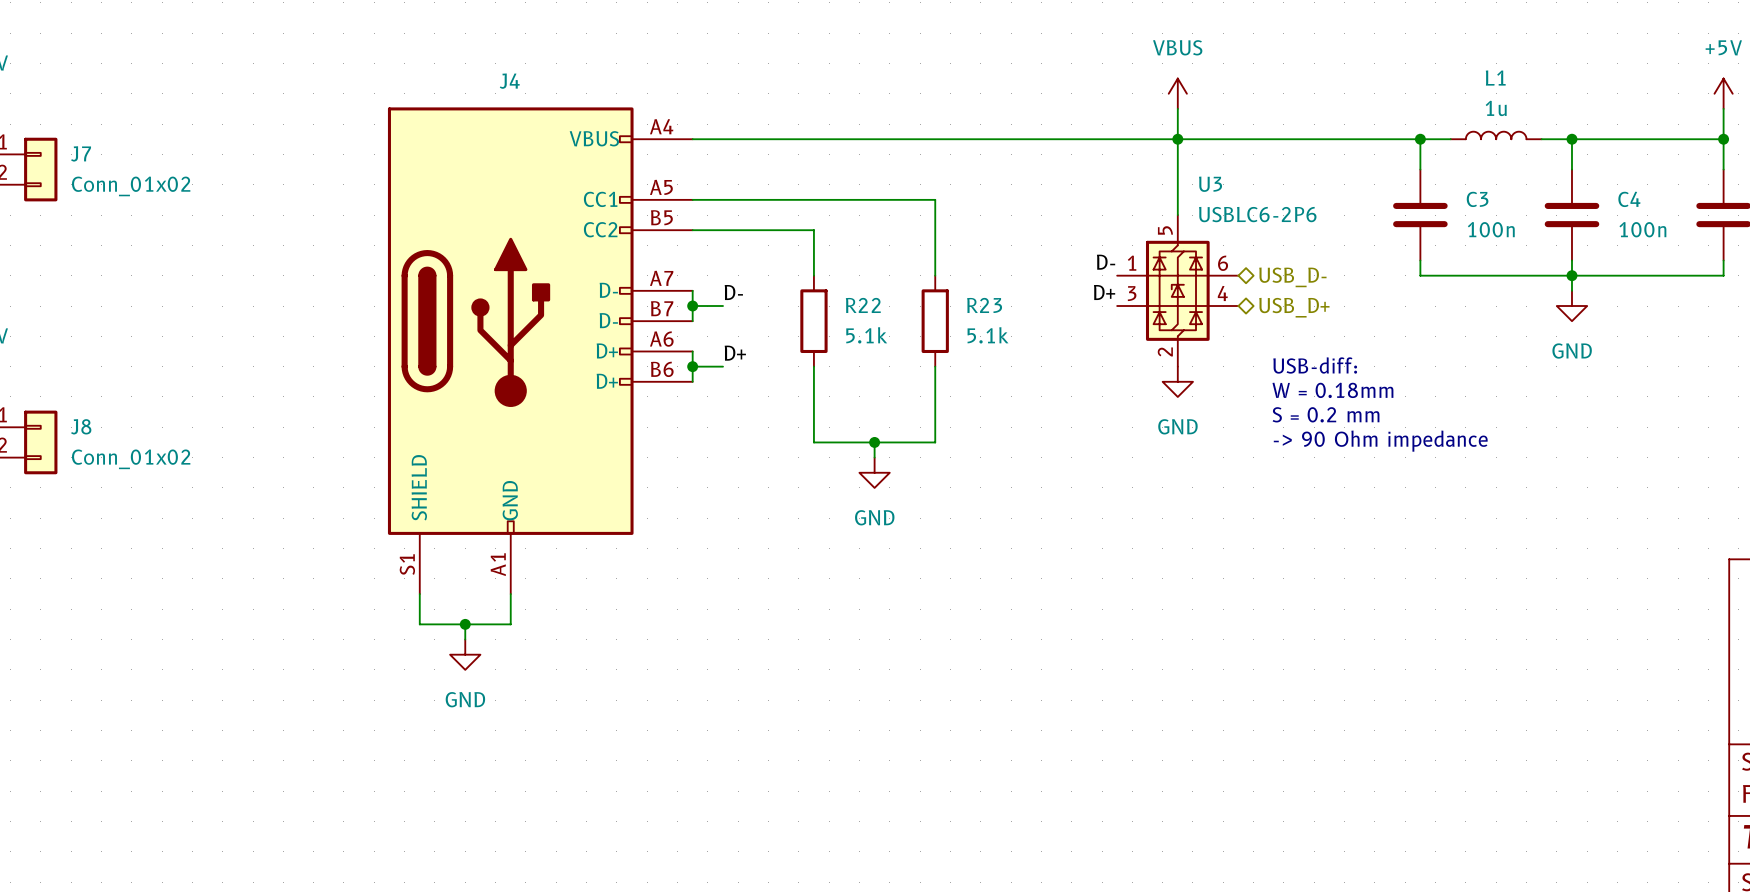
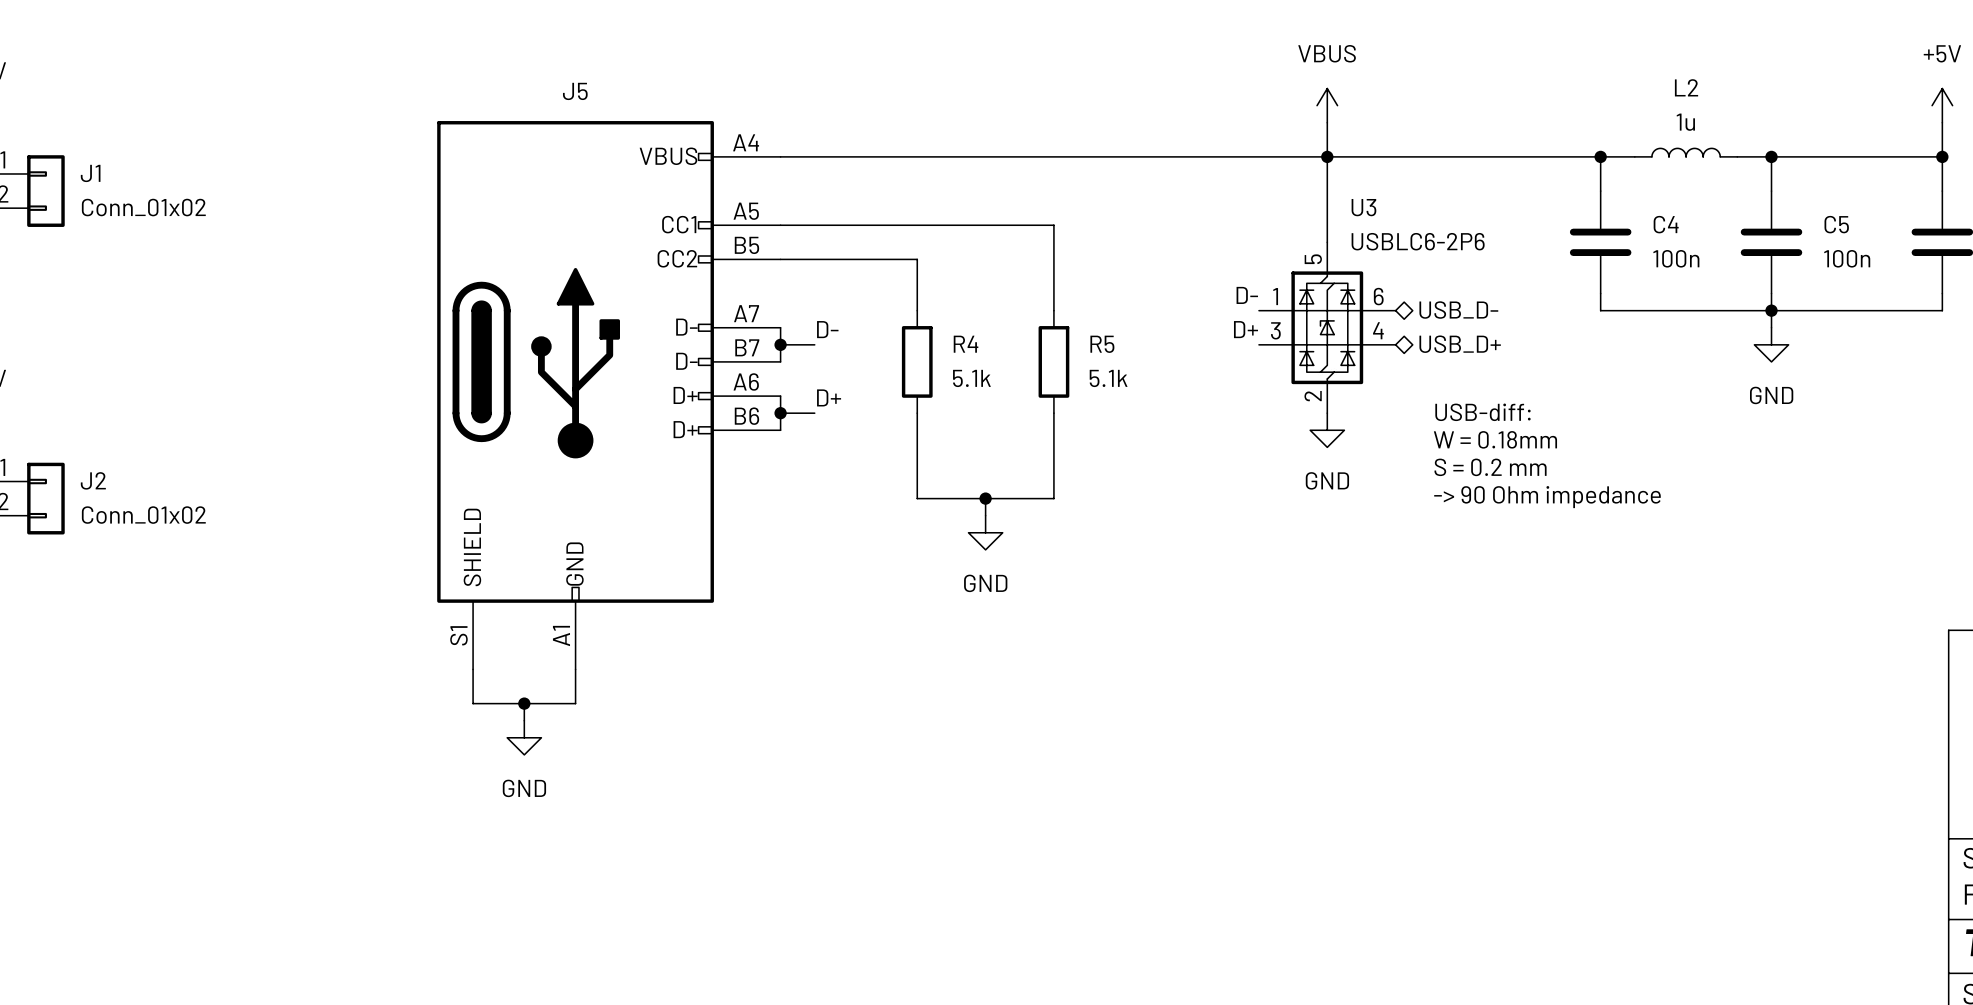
L1 name: L1 (1495, 78) -> L2 (1686, 87)
J4 name: J4 (509, 81) -> J5 (575, 91)
J7 name: J7 (81, 153) -> J1 (90, 173)
C3 name: C3 (1477, 199) -> C4 (1666, 224)
C4 name: C4 (1629, 199) -> C5 (1836, 224)
R22 name: R22 (863, 305) -> R4 (966, 344)
R23 name: R23 (984, 305) -> R5 (1102, 344)
J8 name: J8 (81, 426) -> J2 (93, 480)

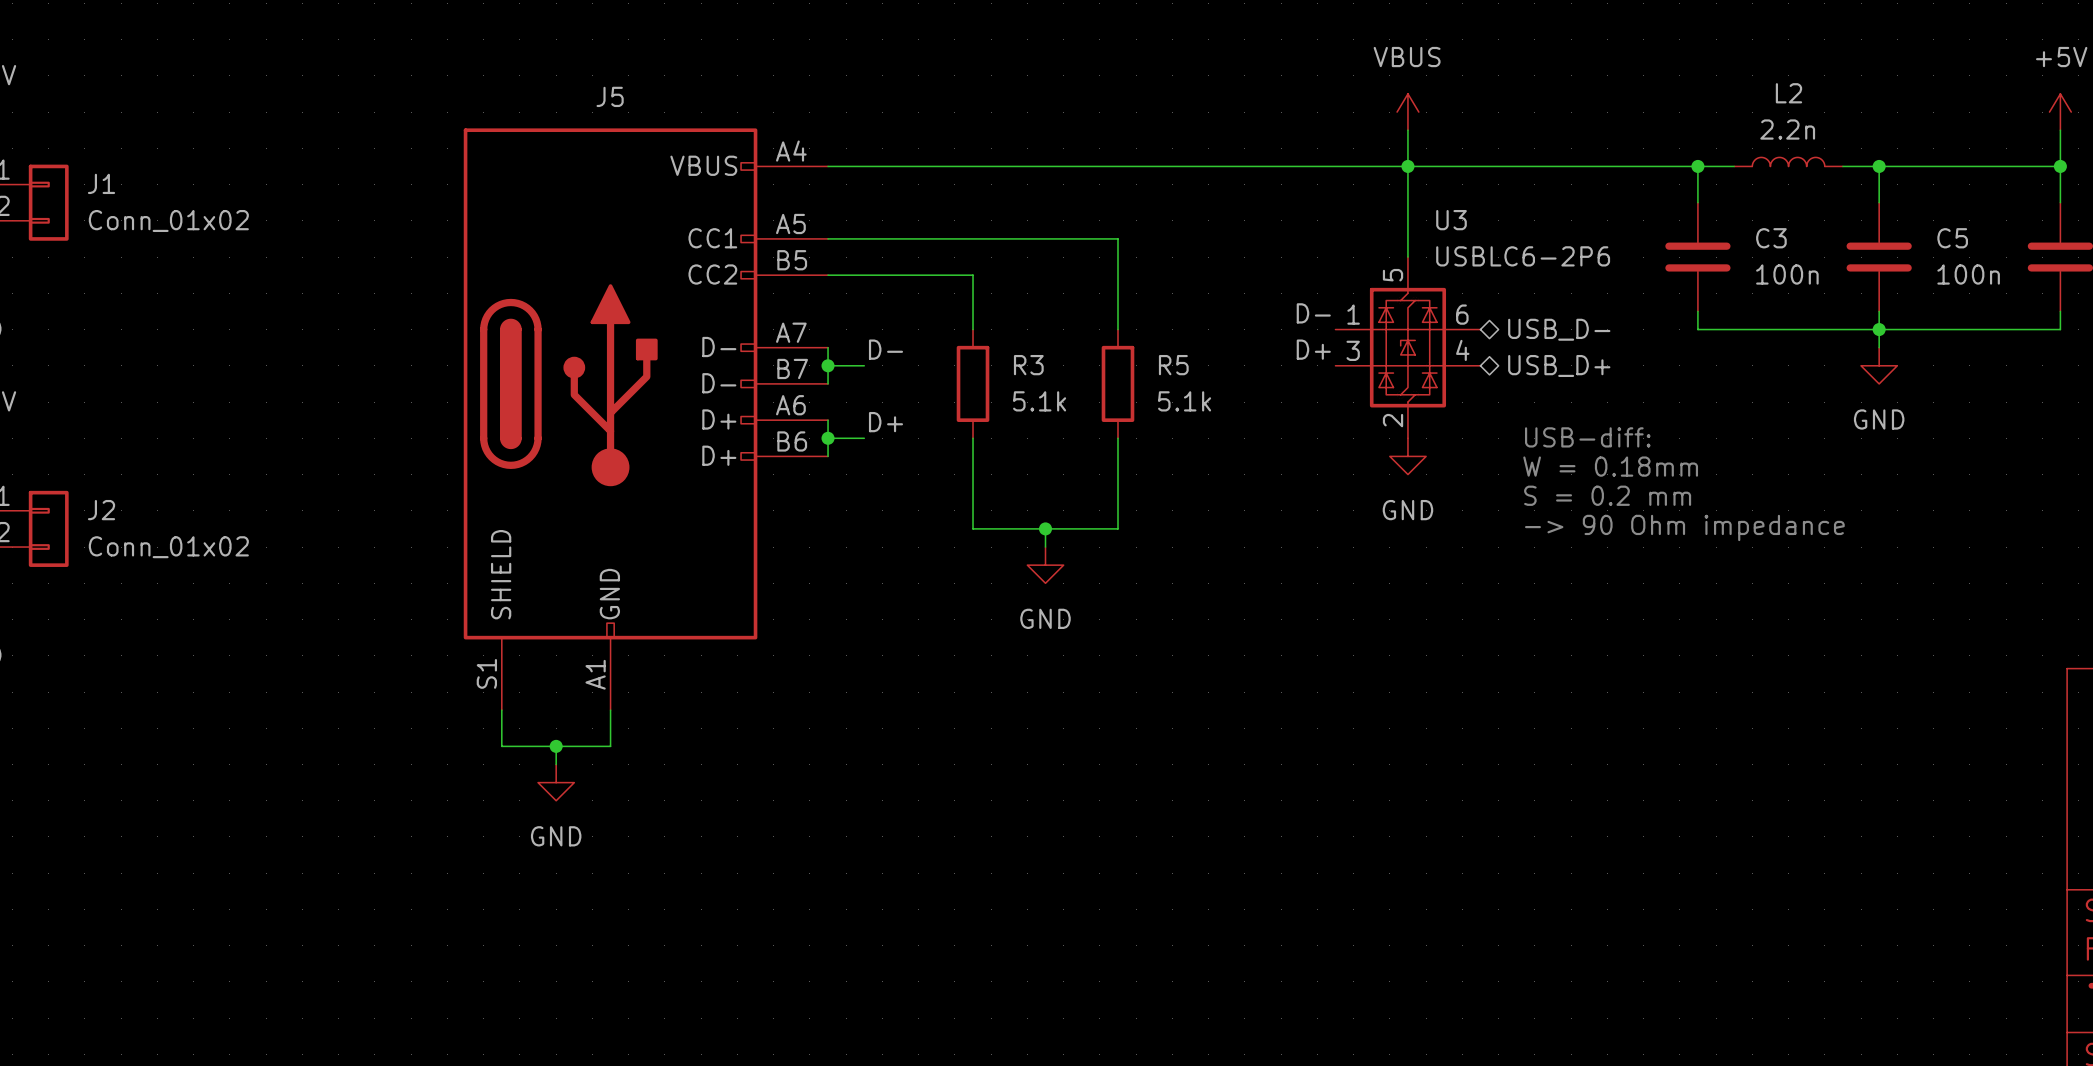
L2 value: 1u (1685, 122) -> 2.2n (1787, 129)
C4 name: C4 (1666, 224) -> C3 (1771, 238)
R4 name: R4 (966, 344) -> R3 (1028, 365)

